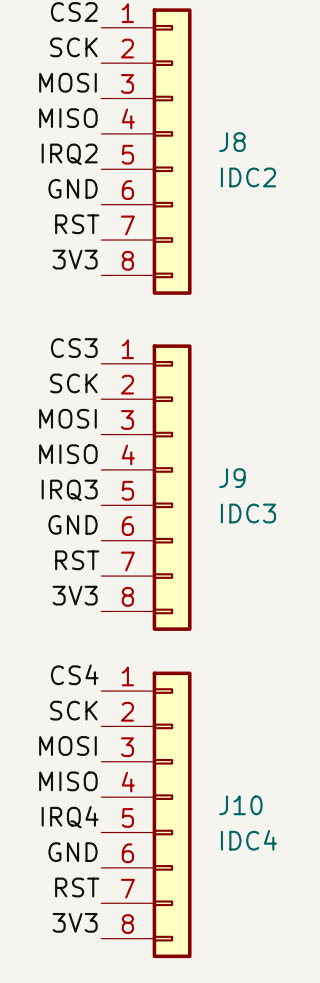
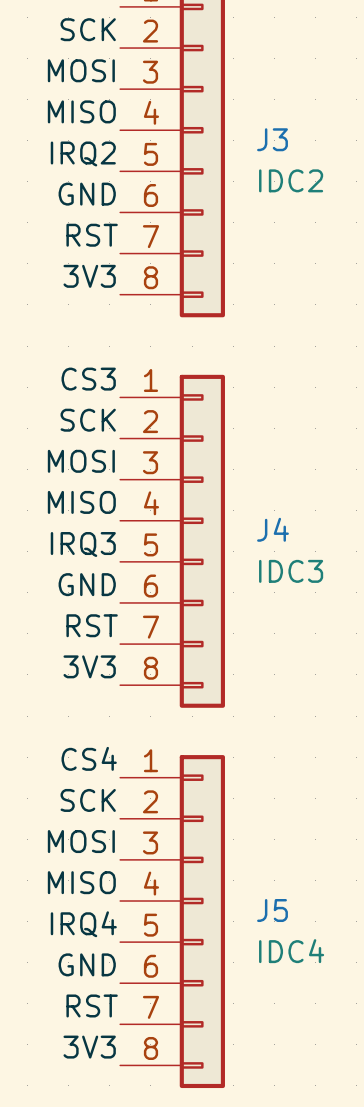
J8 name: J8 (232, 142) -> J3 (272, 139)
J9 name: J9 (232, 478) -> J4 (272, 529)
J10 name: J10 (240, 805) -> J5 (272, 910)

